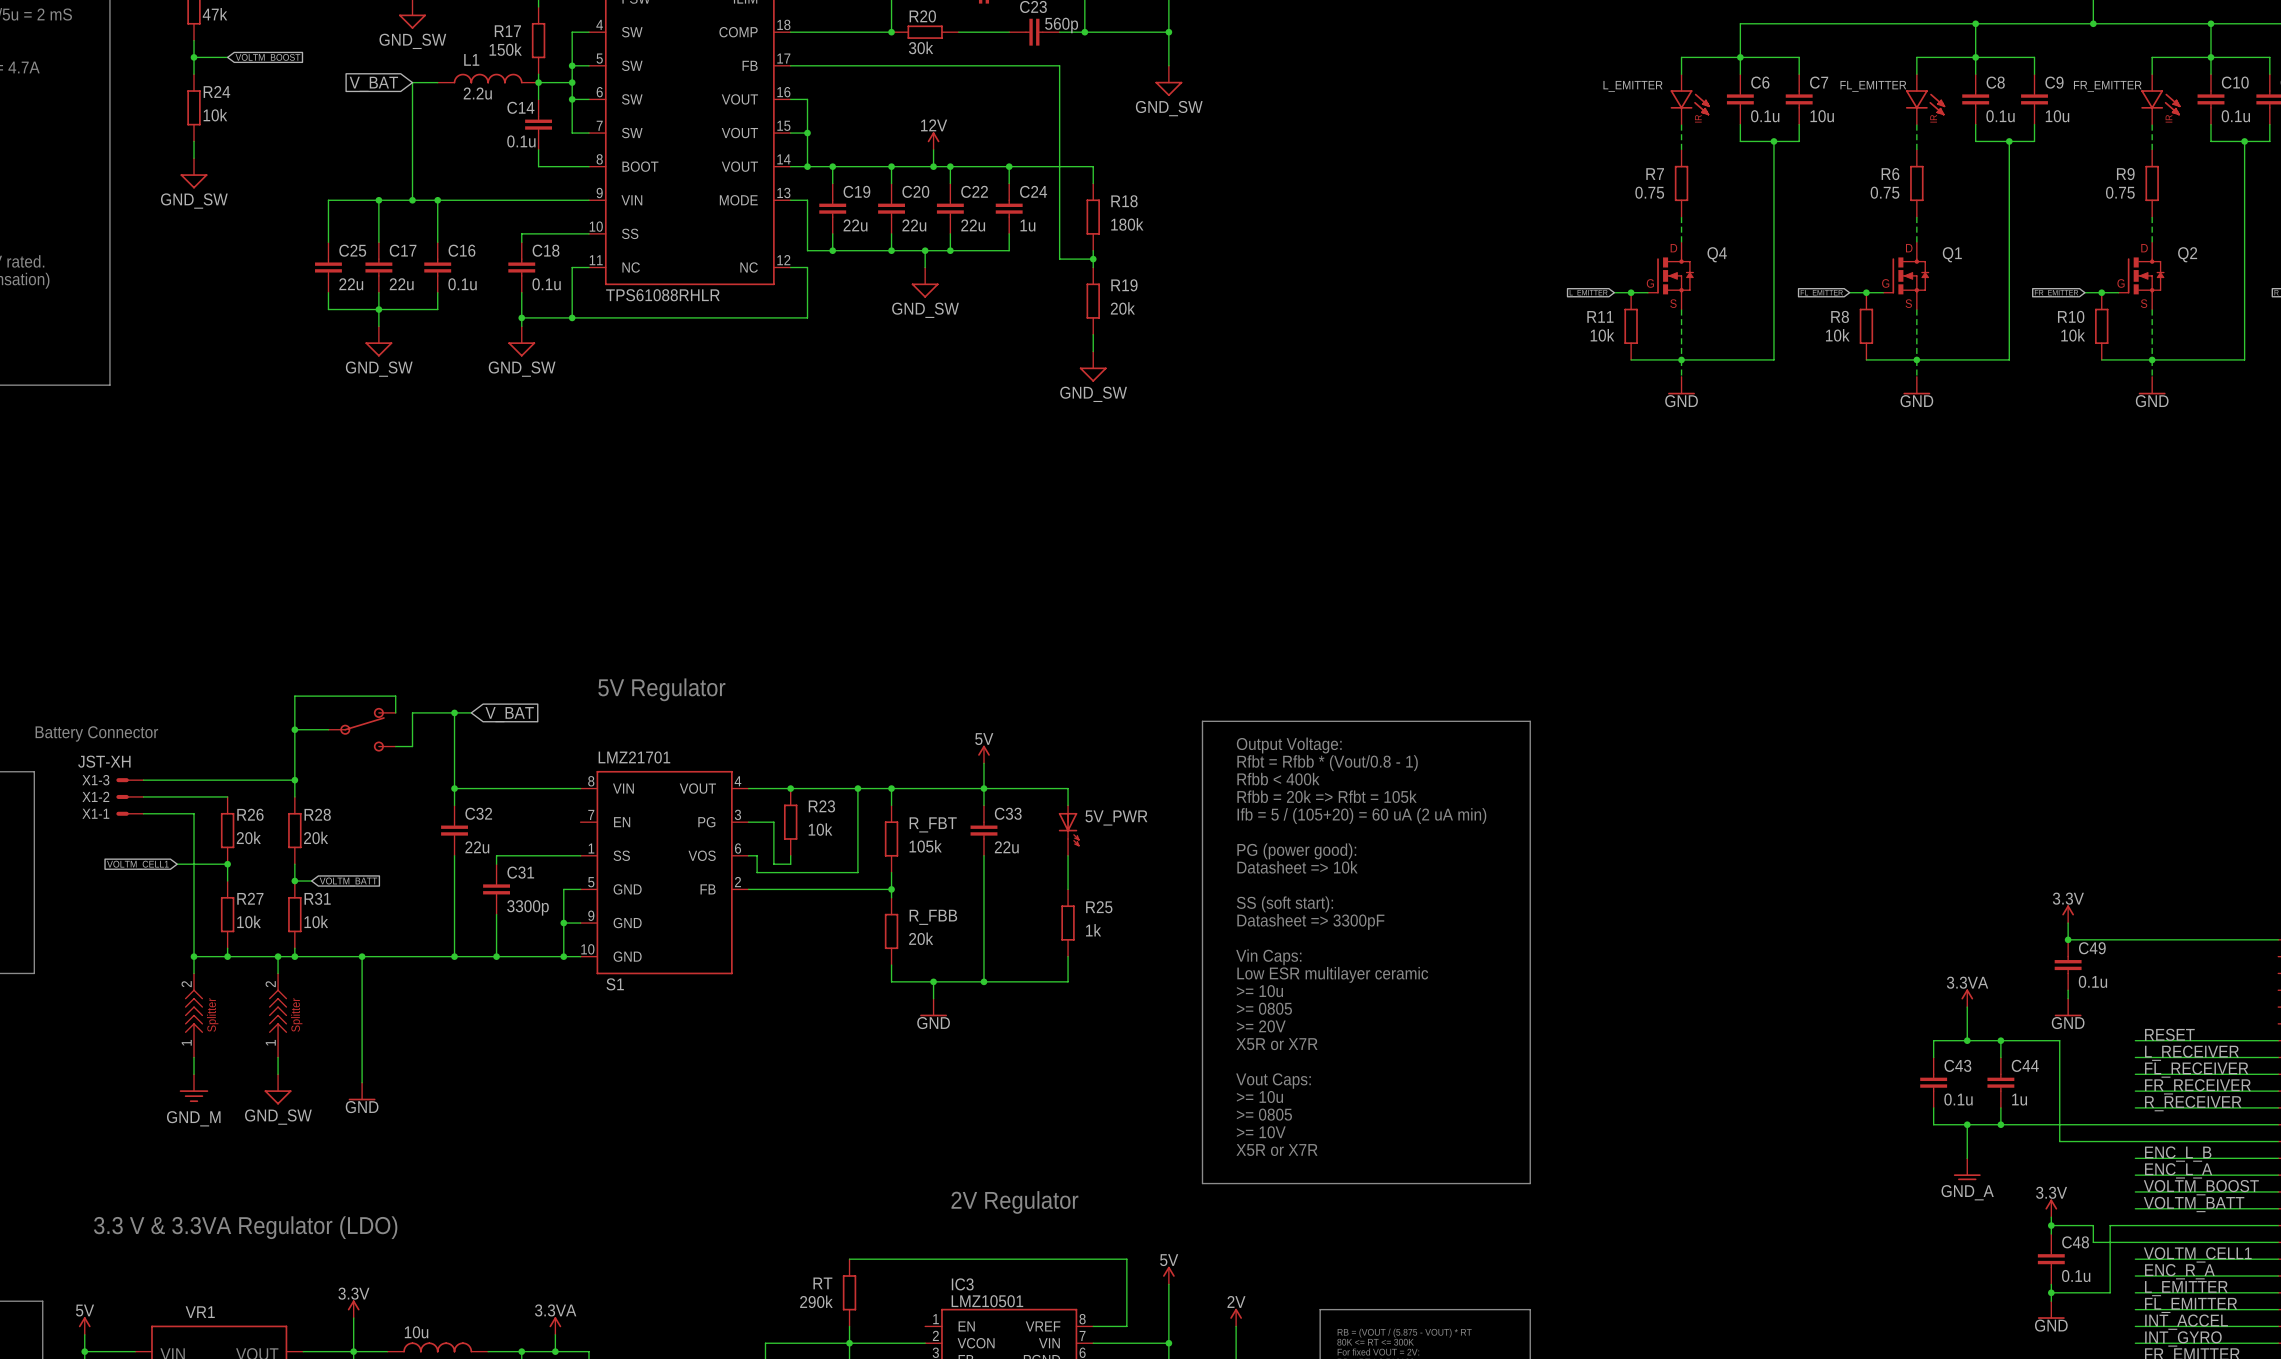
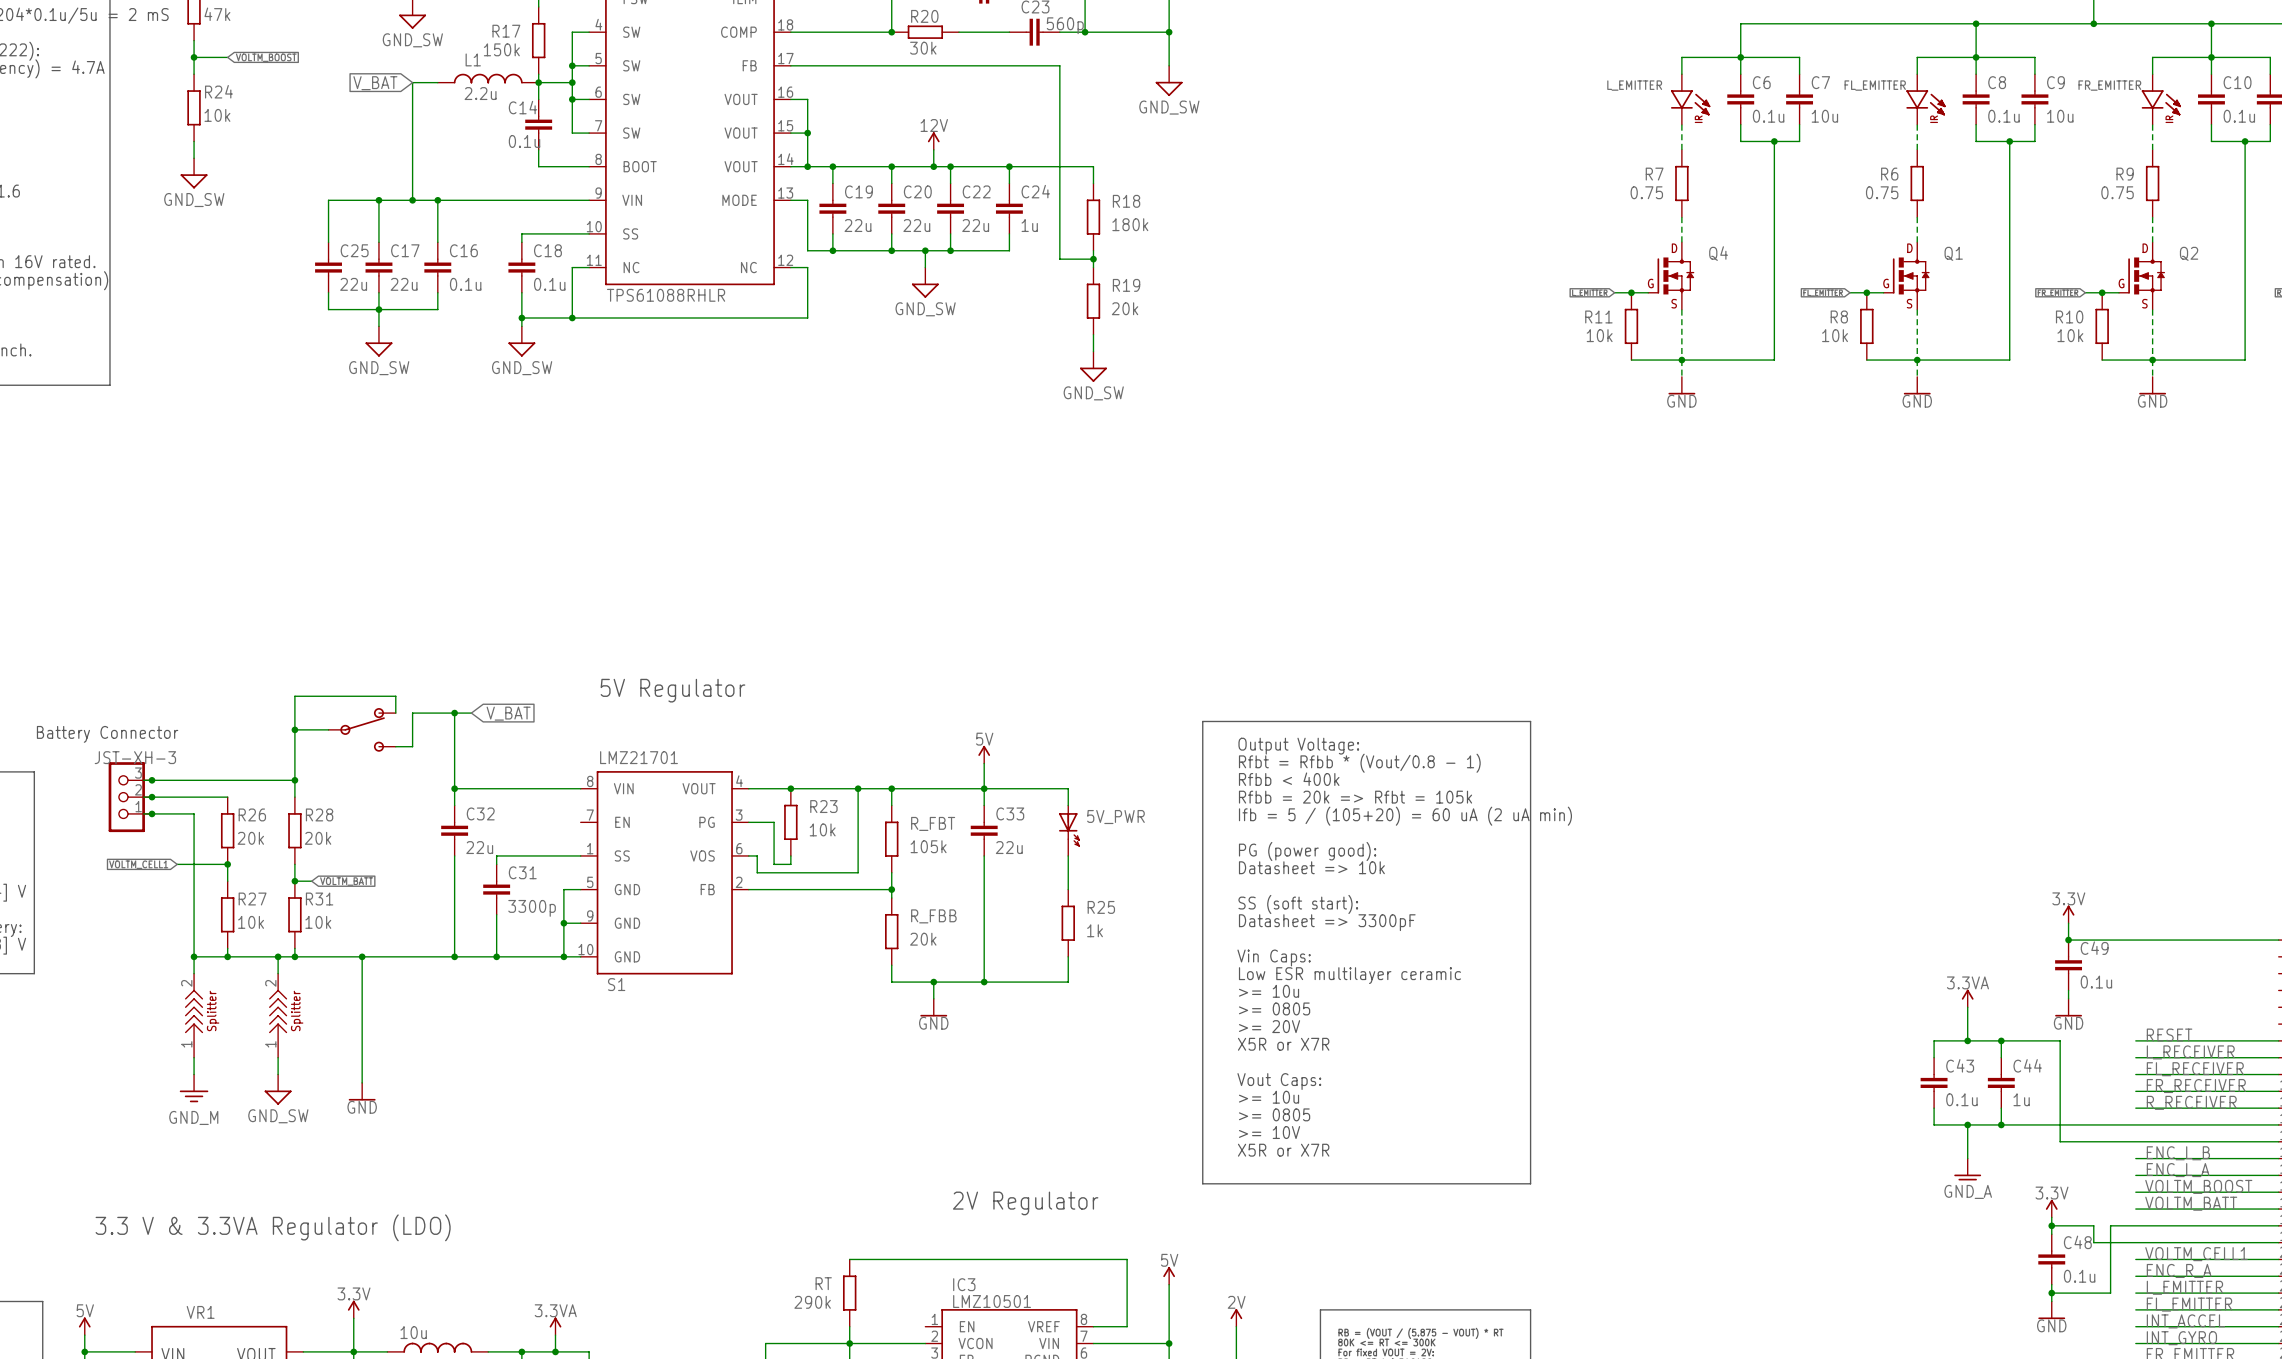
X1-3: (129, 780) -> none
junction: none -> (152, 780)
X1-2: (129, 796) -> none
part: none -> JST-XH-3 (130, 797)
junction: none -> (152, 797)
X1-1: JST-XH (129, 813) -> none
junction: none -> (152, 813)

